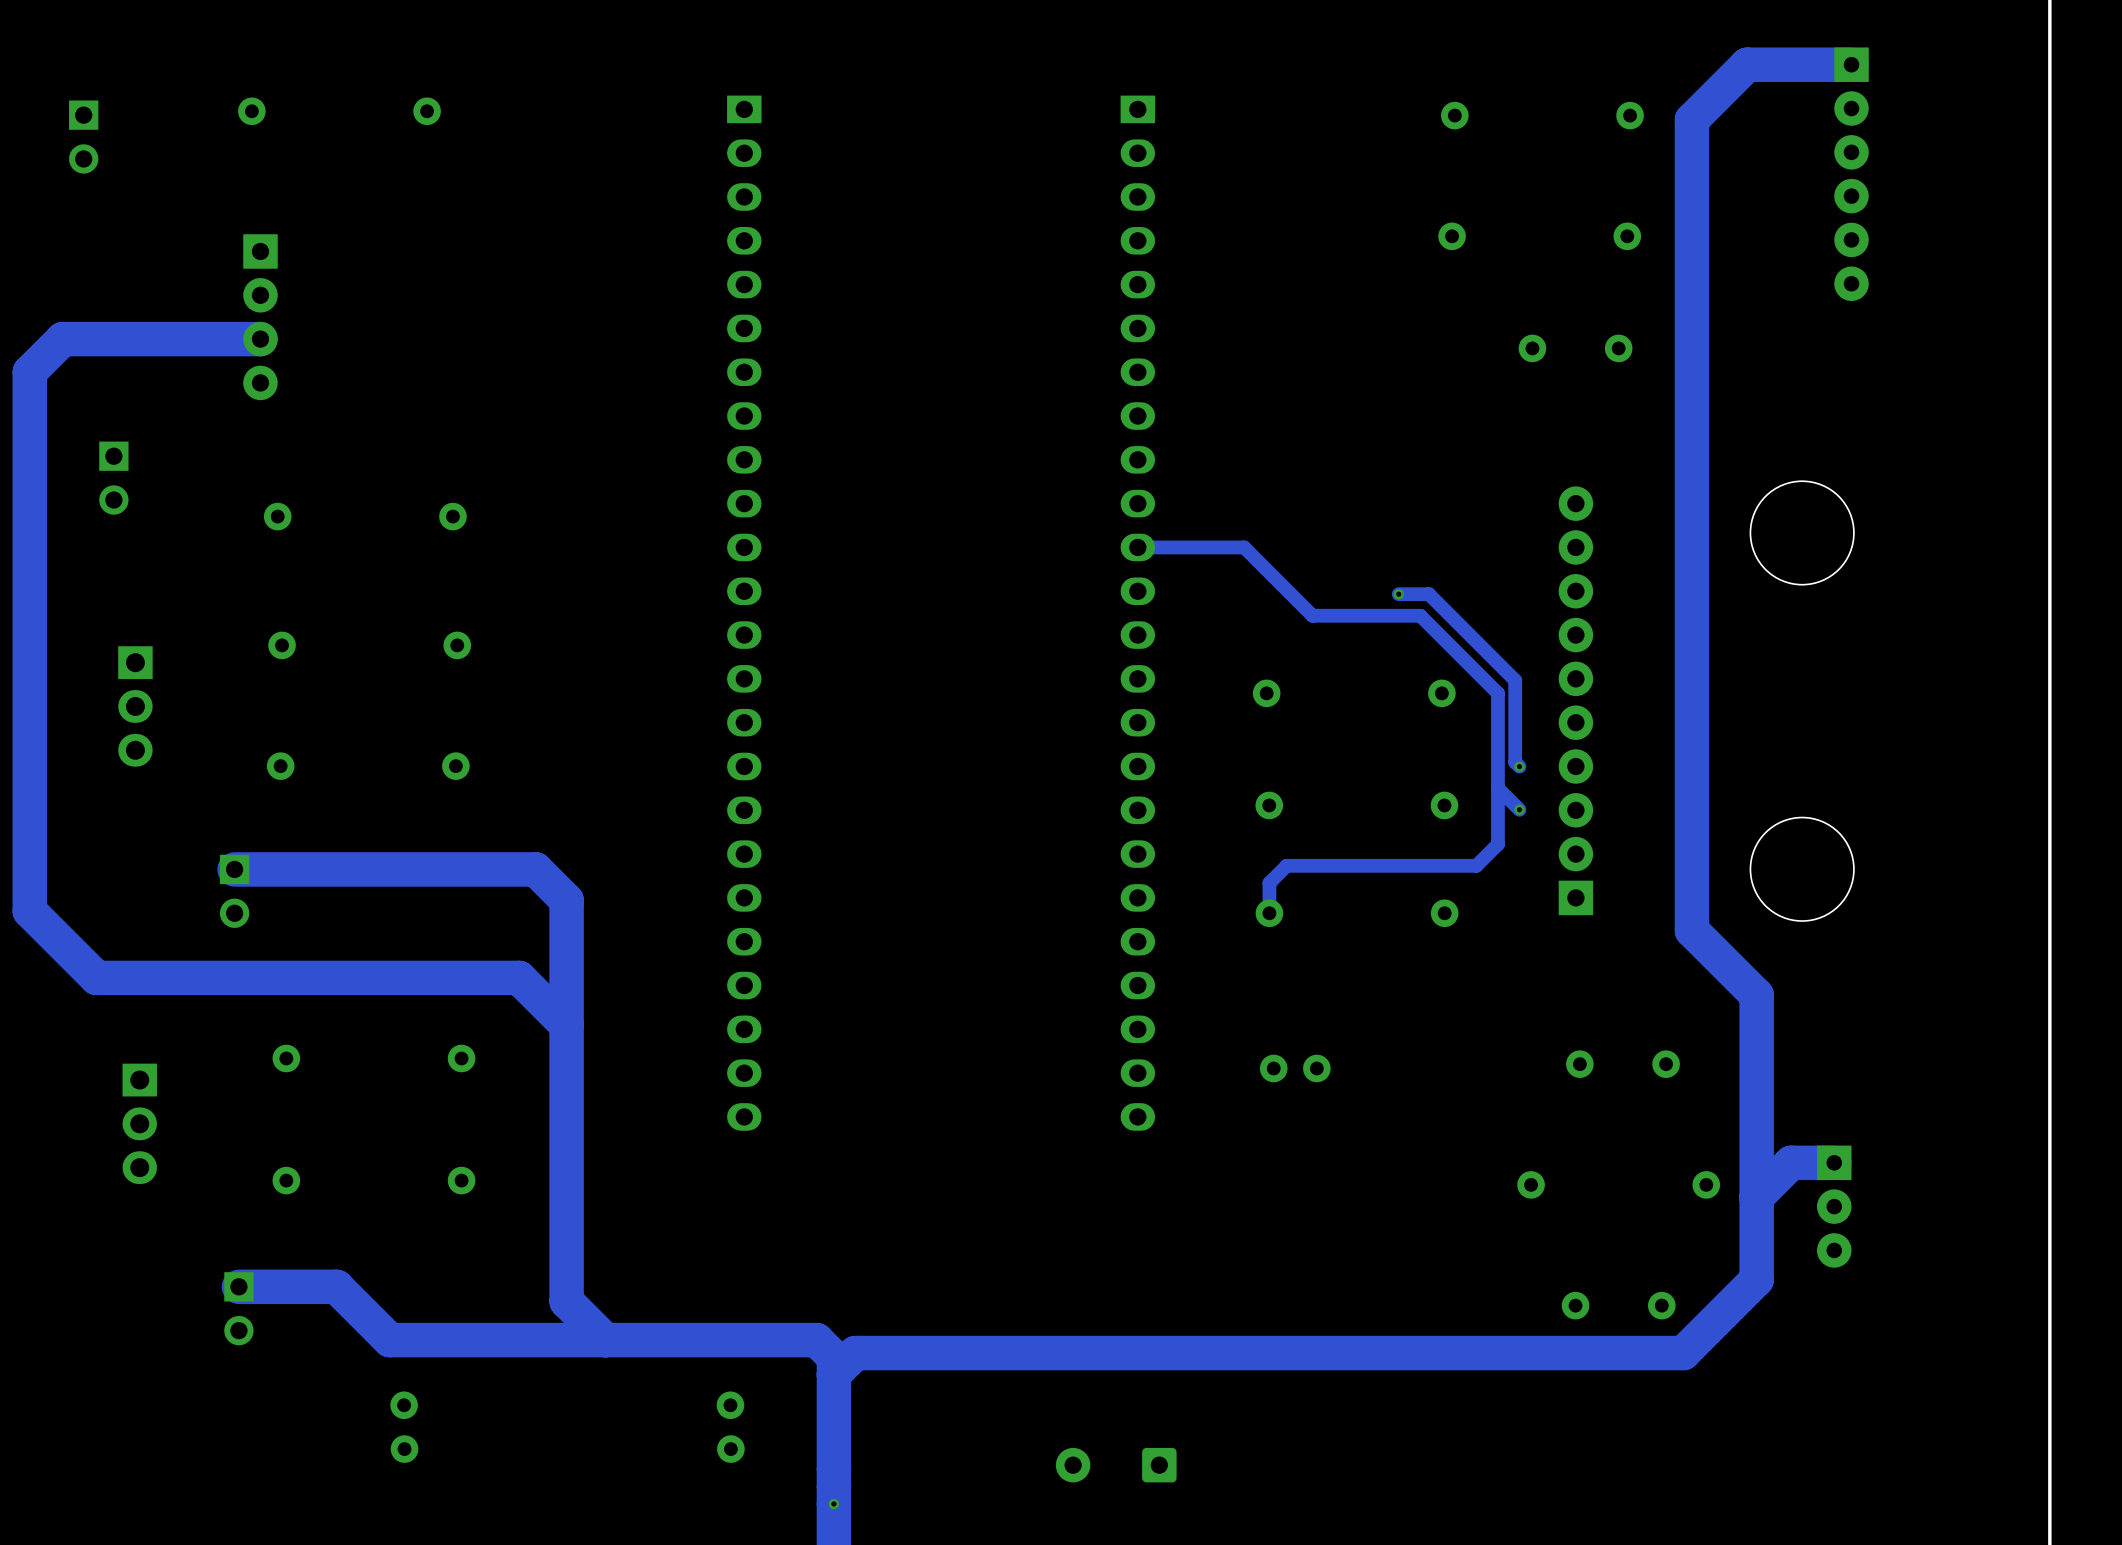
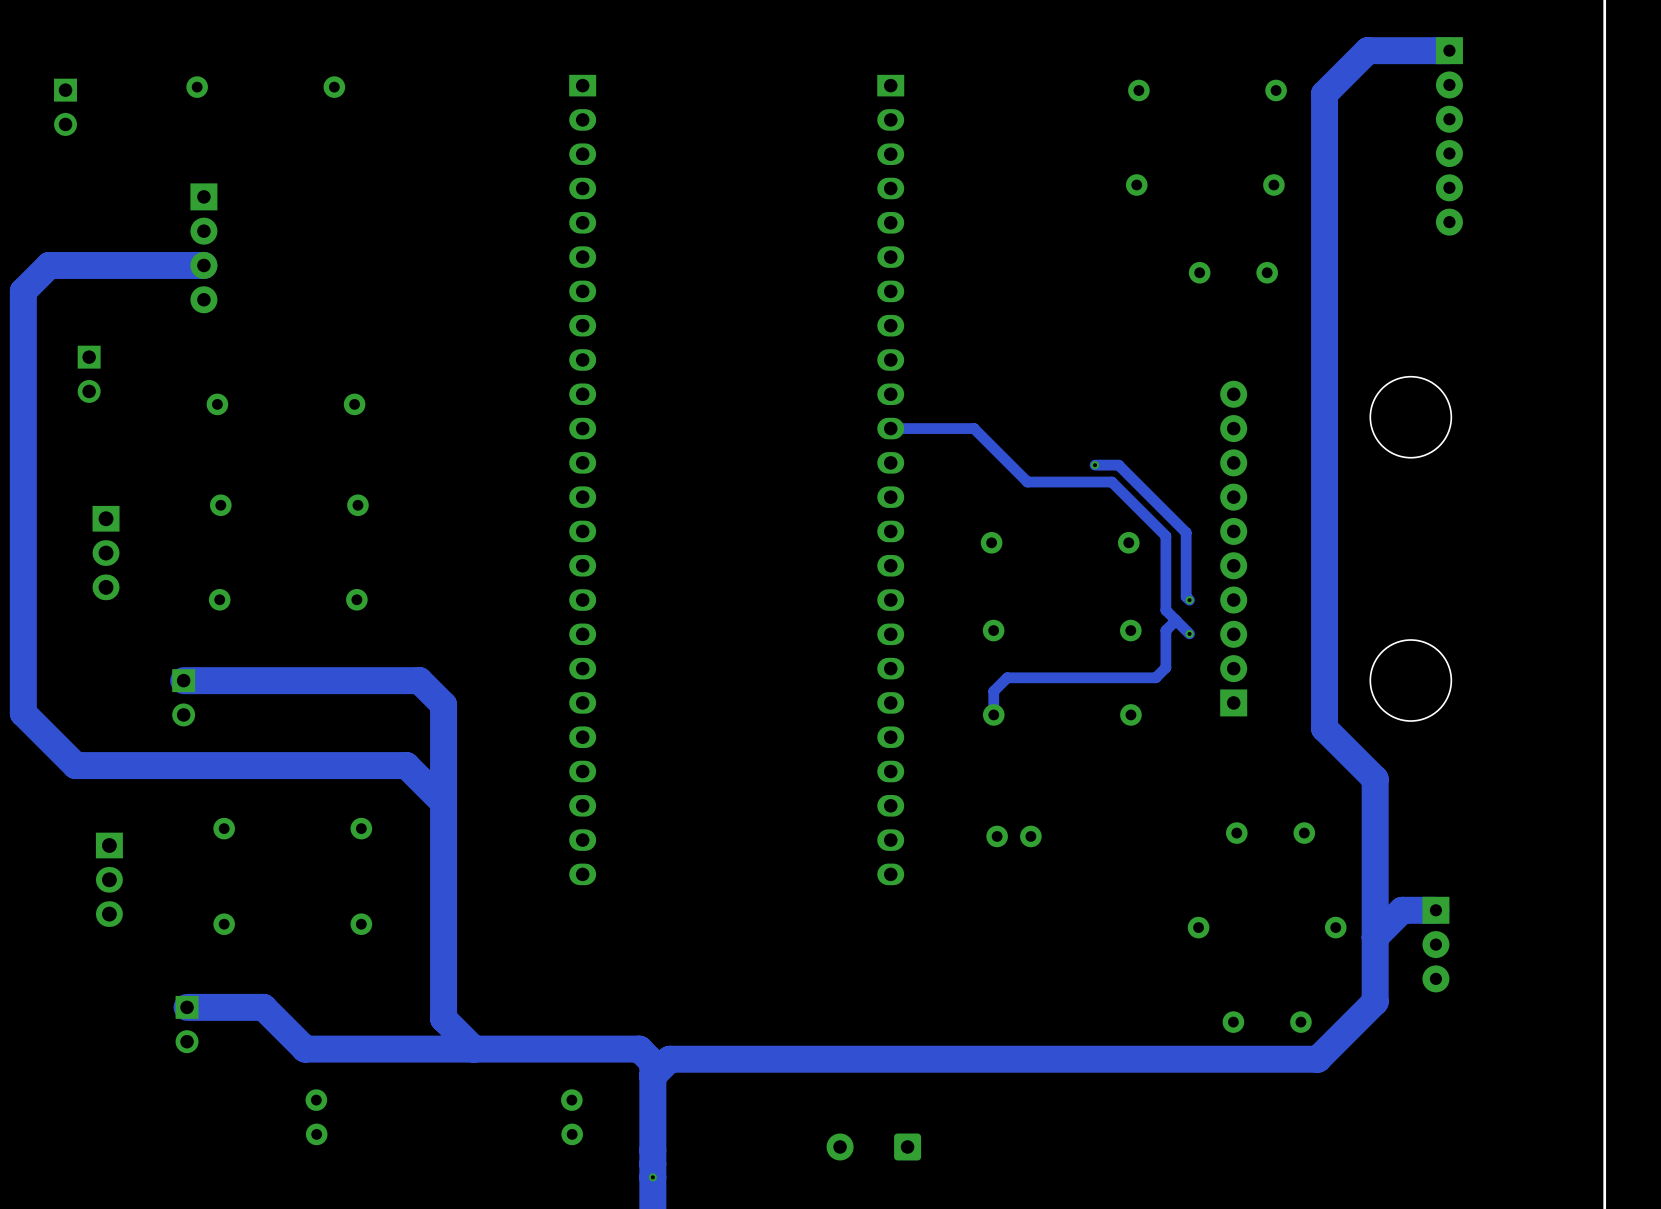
track: (1489, 684) (1497, 693) (1497, 844) (1489, 852) -> (1165, 536) (1165, 610) (1172, 617)
track: none -> (1176, 620) (1165, 630) (1165, 667)

